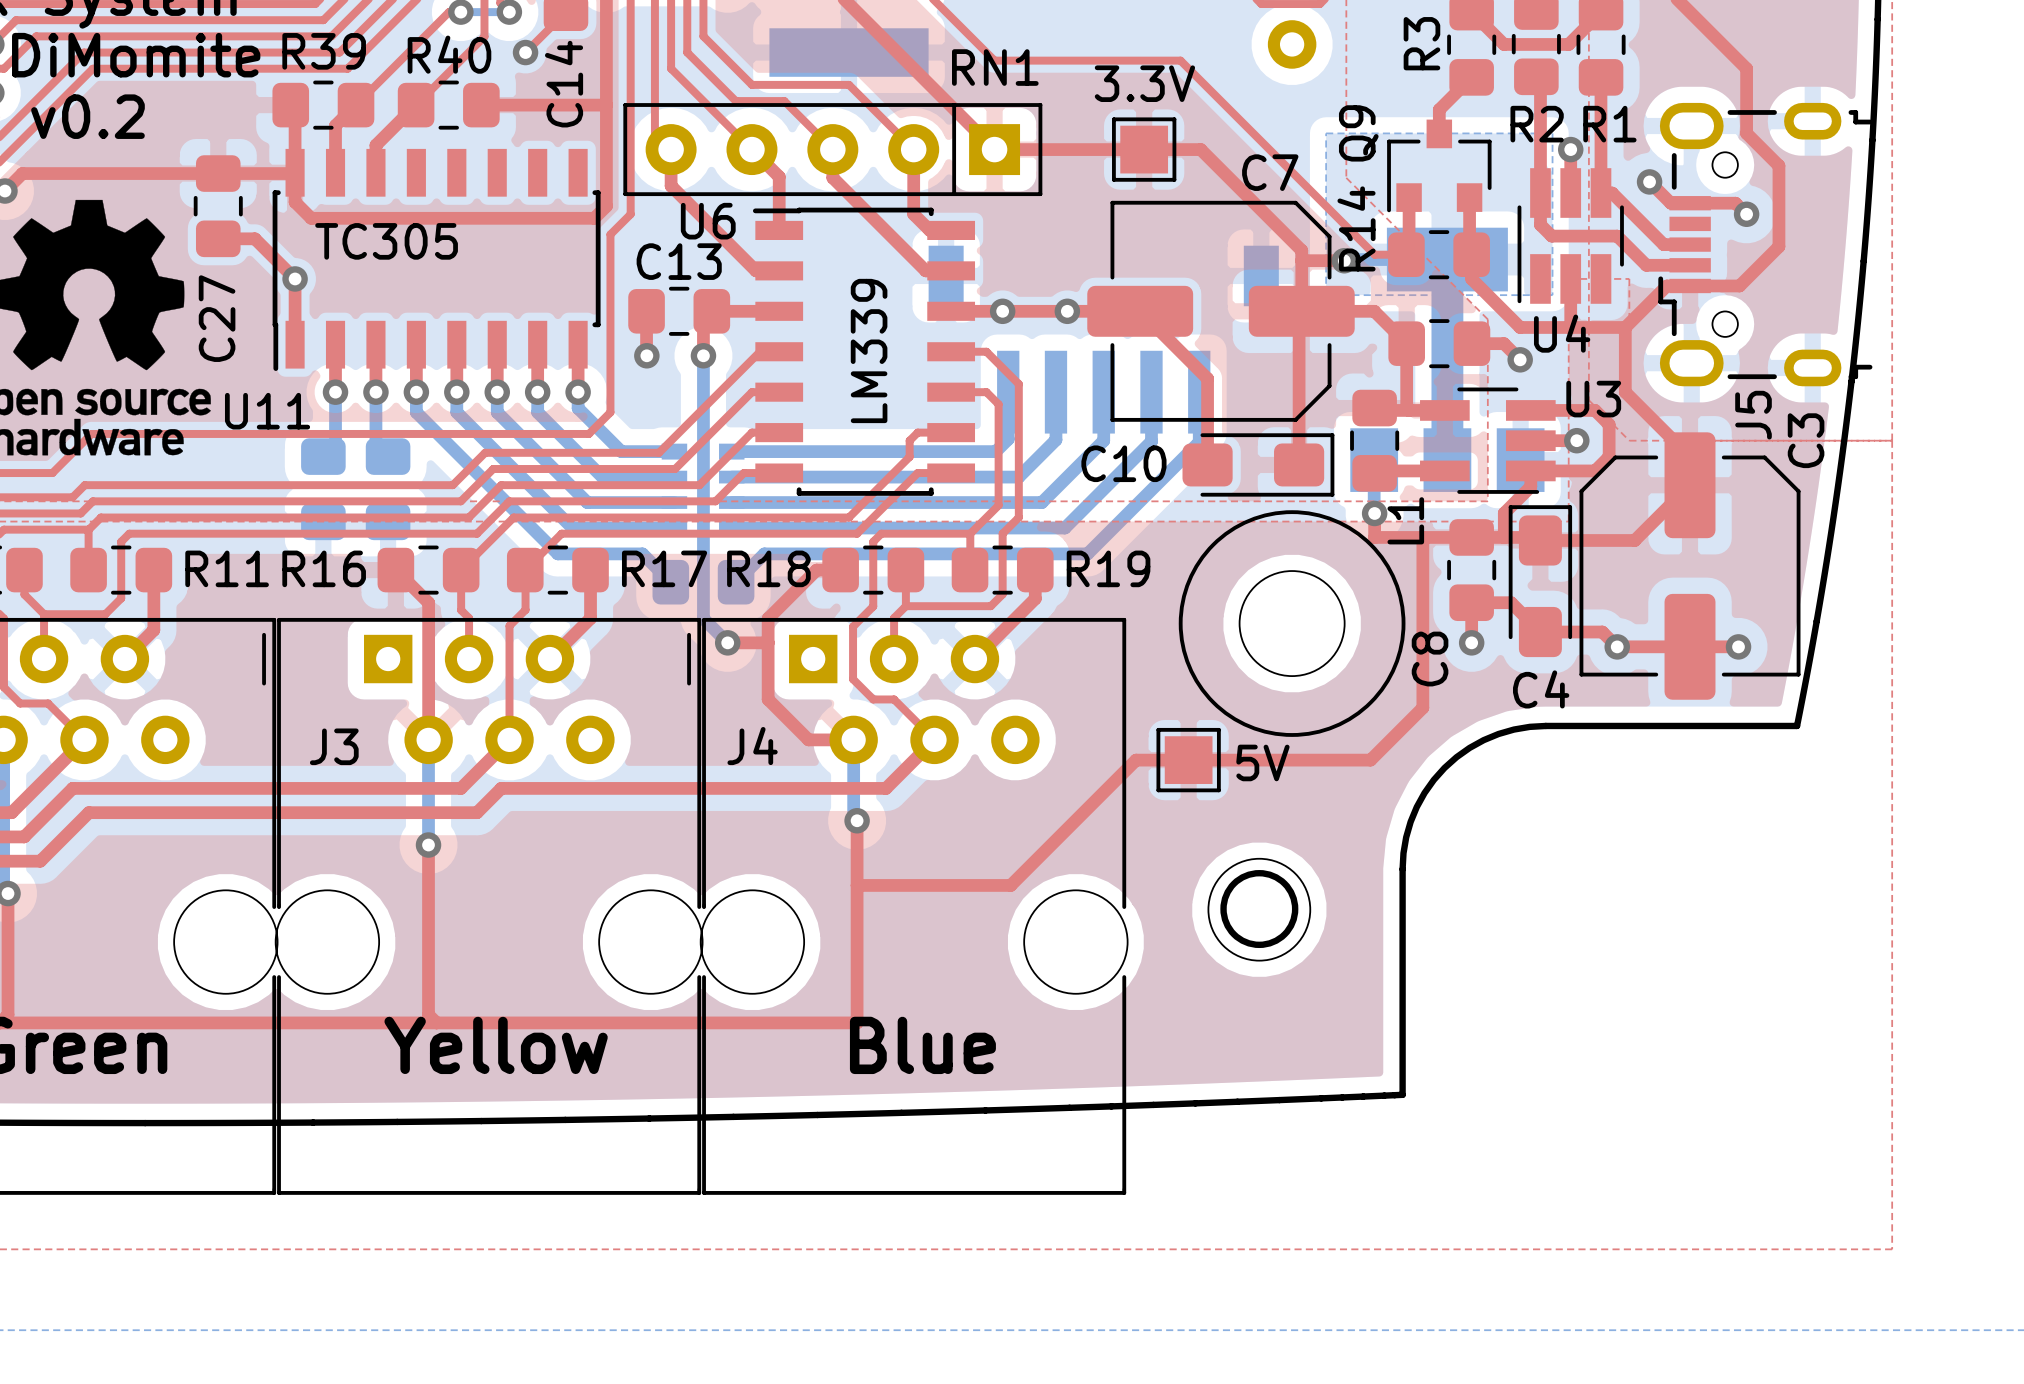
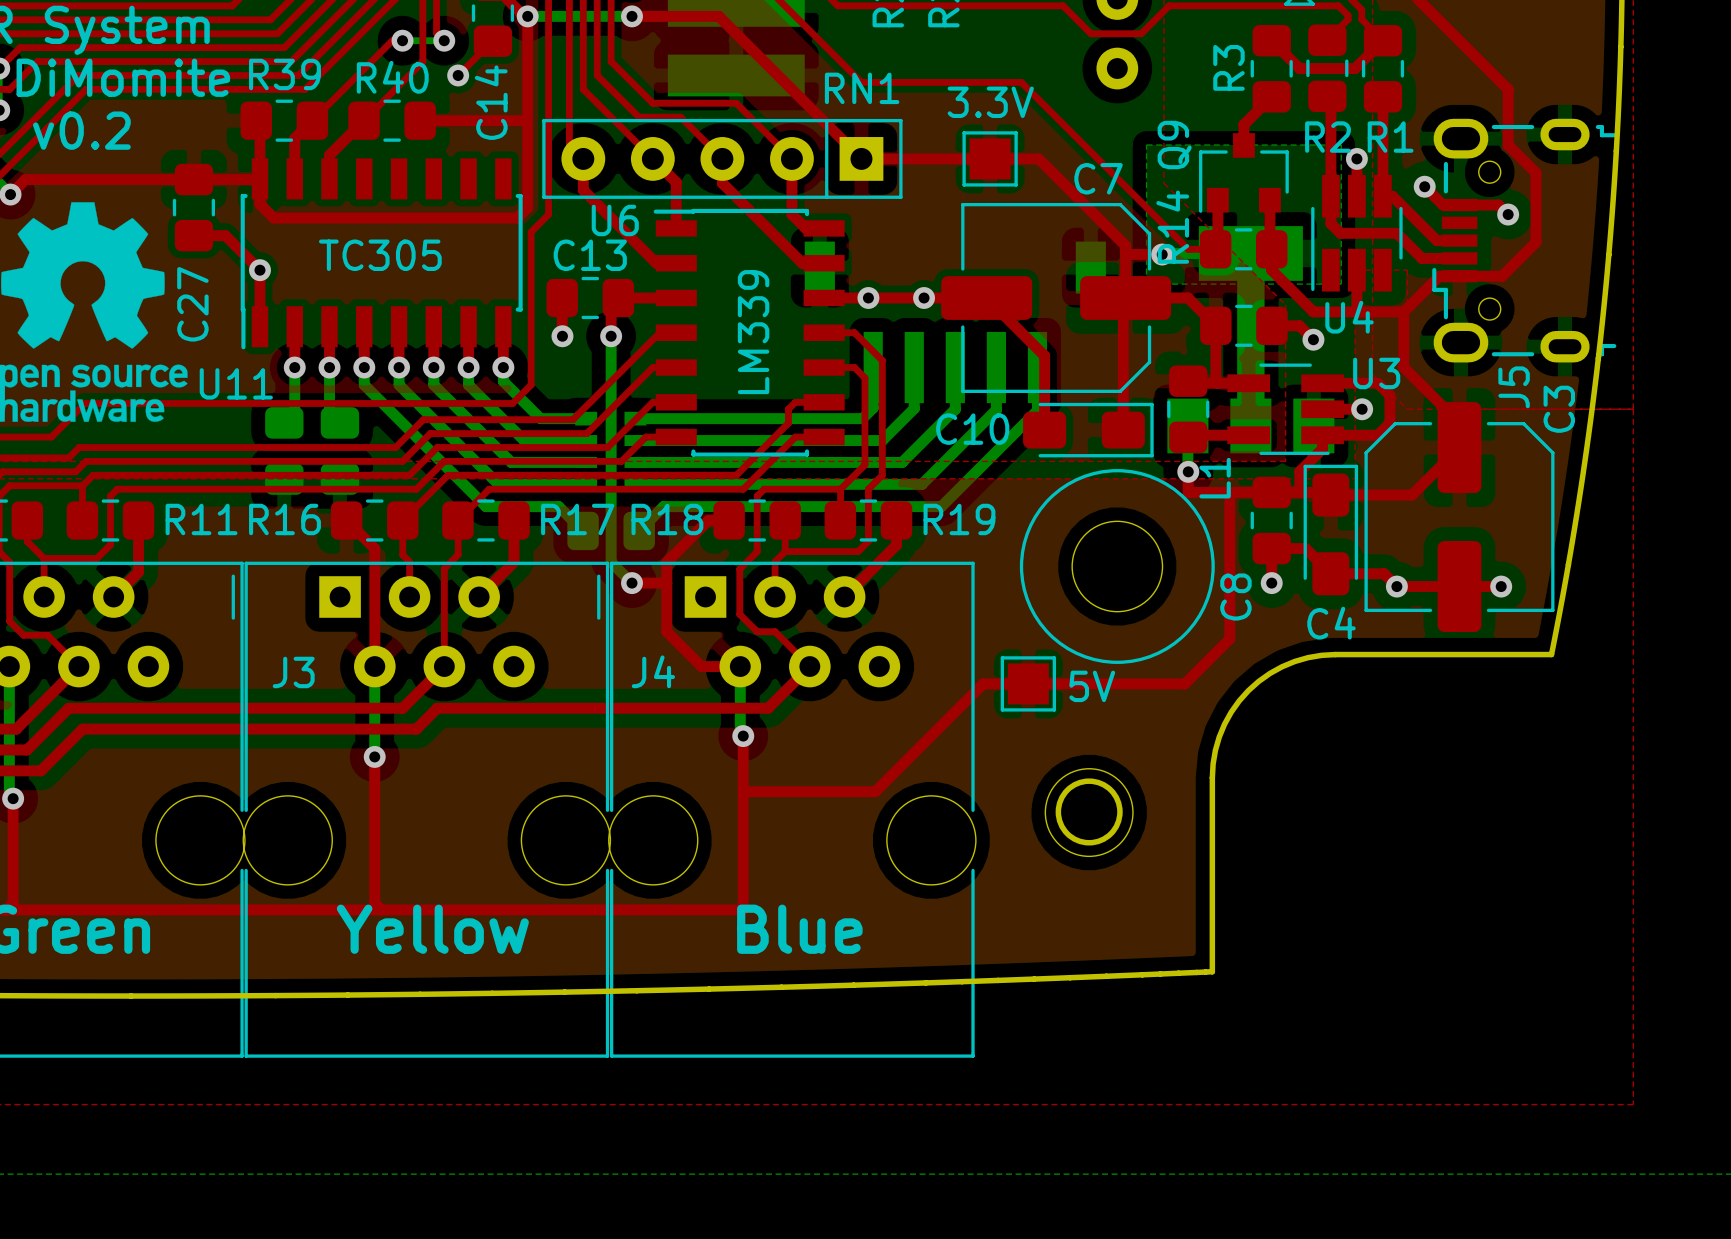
U11 value position: TC305 (386, 241) -> TC305 (380, 255)

